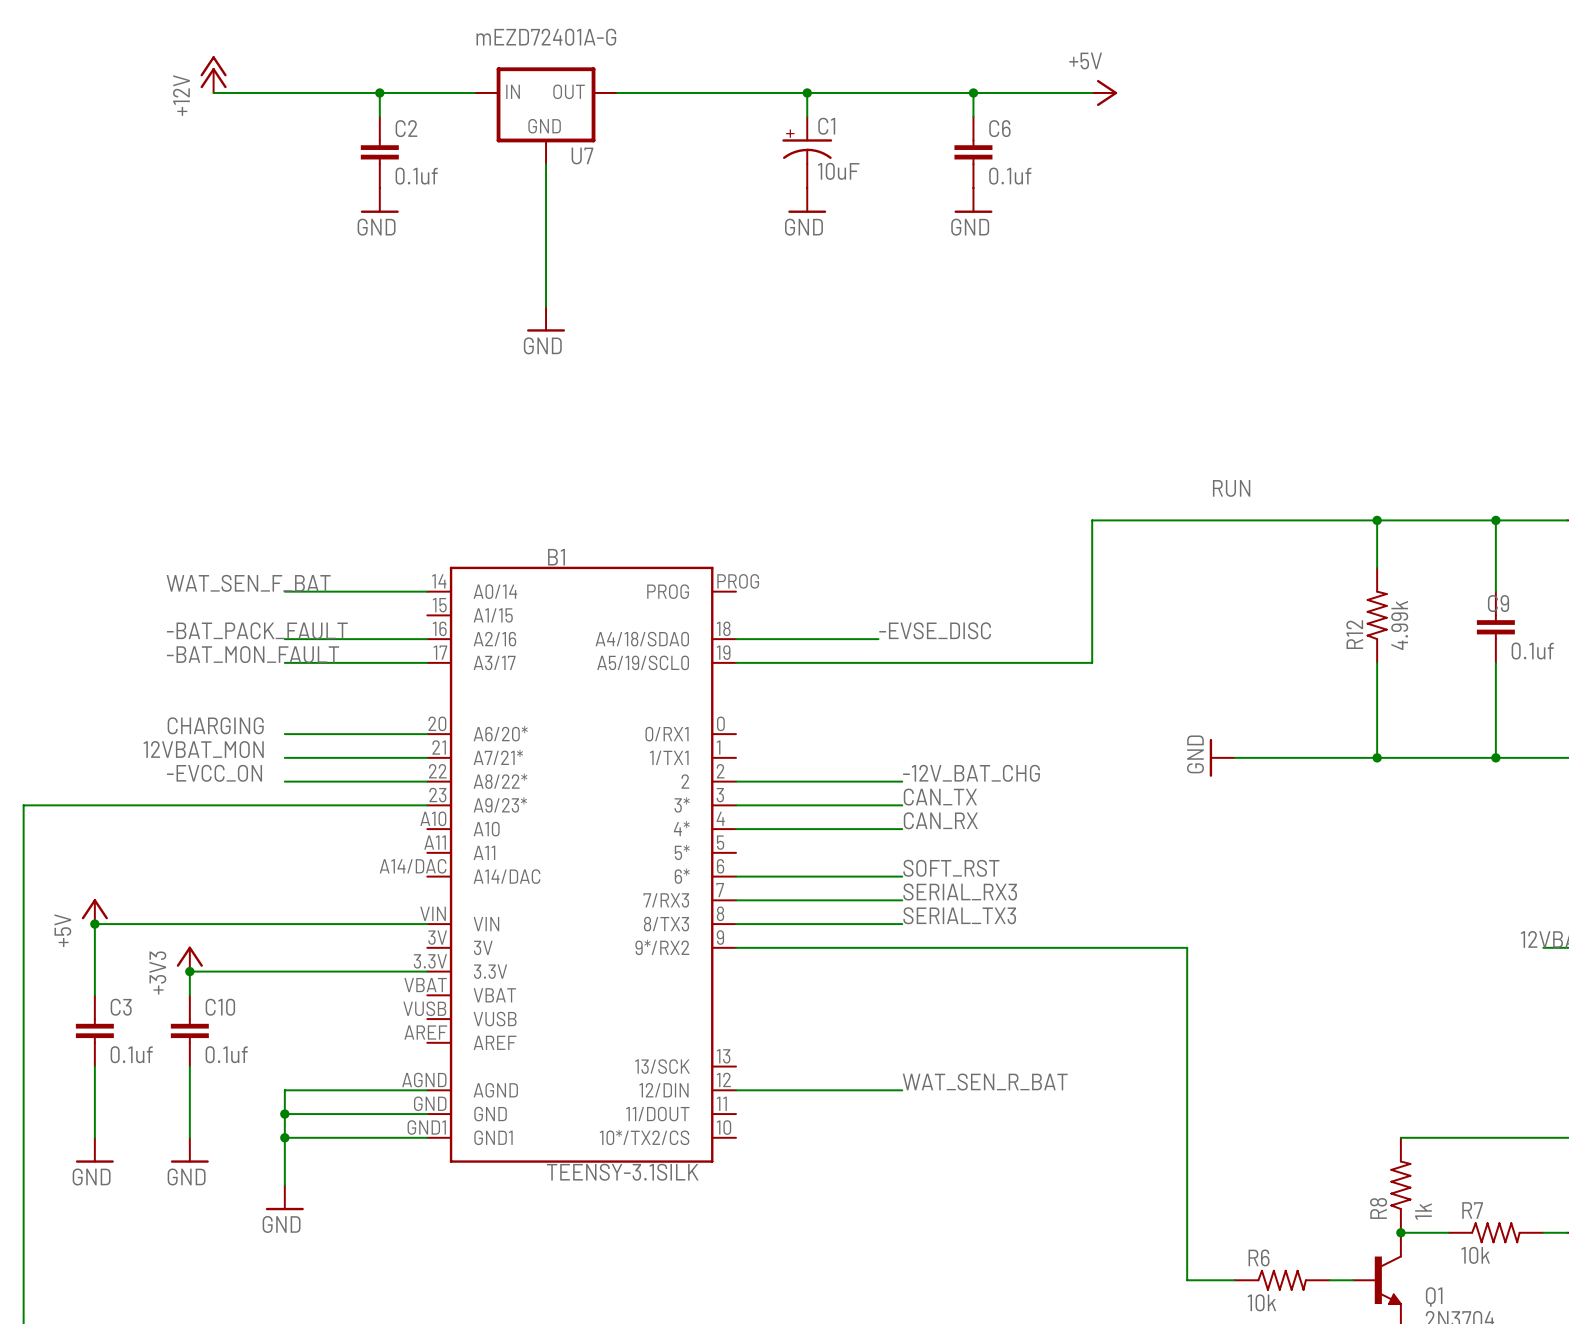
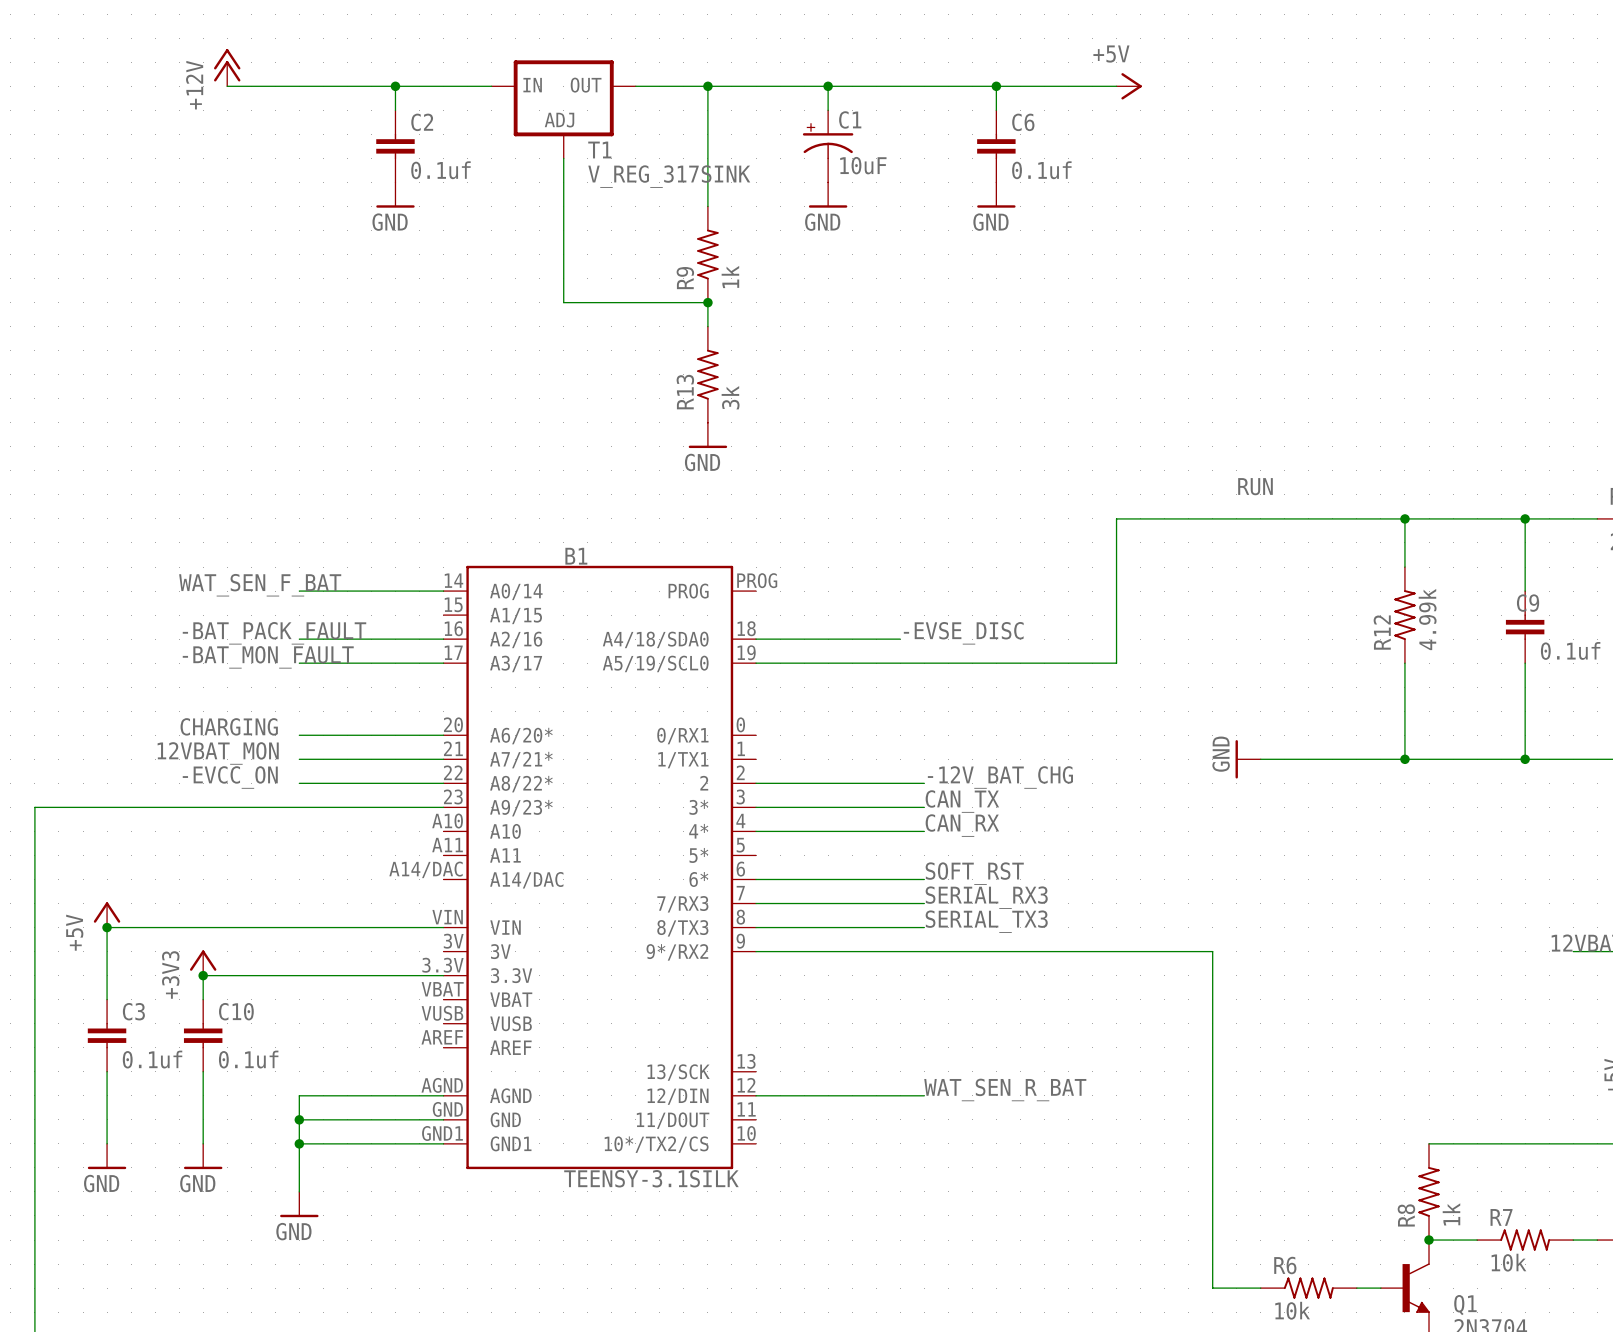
U7 value: mEZD72401A-G (546, 37) -> V_REG_317SINK (669, 176)
wire: none -> (707, 86) (707, 206)
junction: none -> (707, 86)
U7 text: GND (544, 126) -> ADJ (559, 120)
U7 name: U7 (582, 156) -> T1 (599, 150)
R9: none -> 1k (707, 254)
wire: none -> (563, 302) (707, 302) (707, 326)
junction: none -> (707, 302)
power symbol position: GND (546, 319) -> GND (707, 435)
R13: none -> 3k (707, 374)

